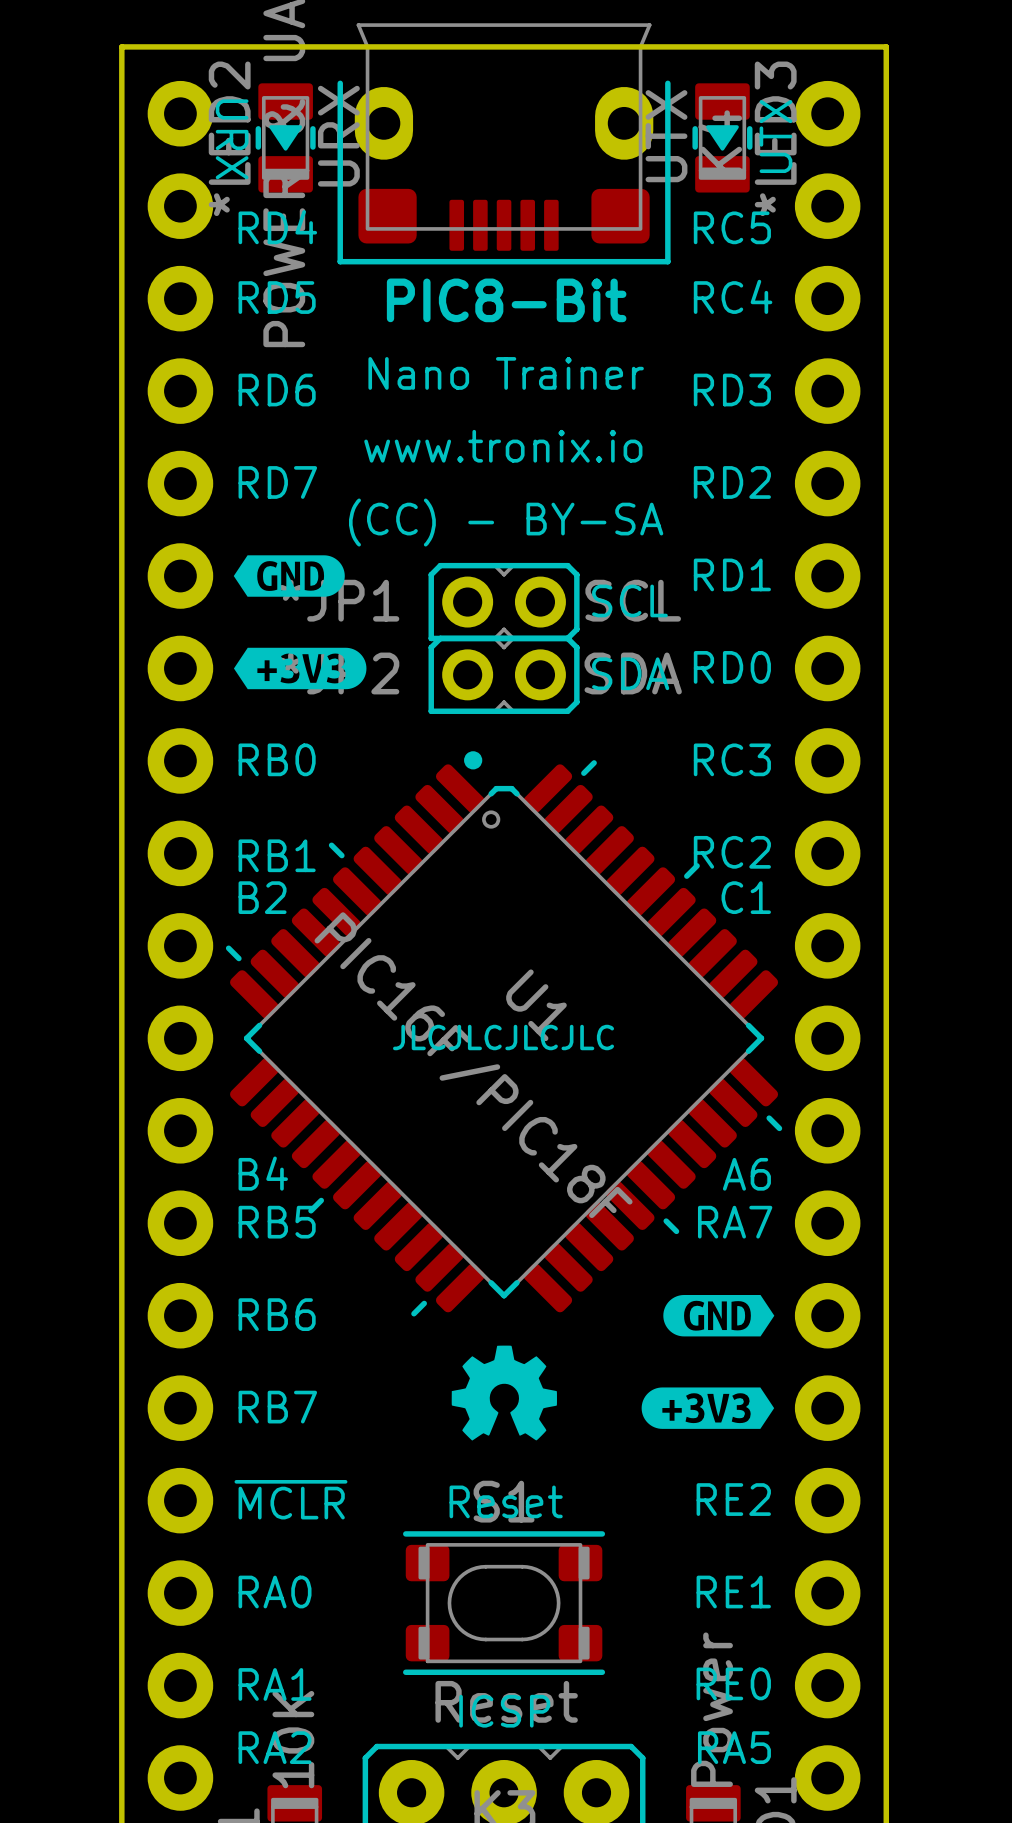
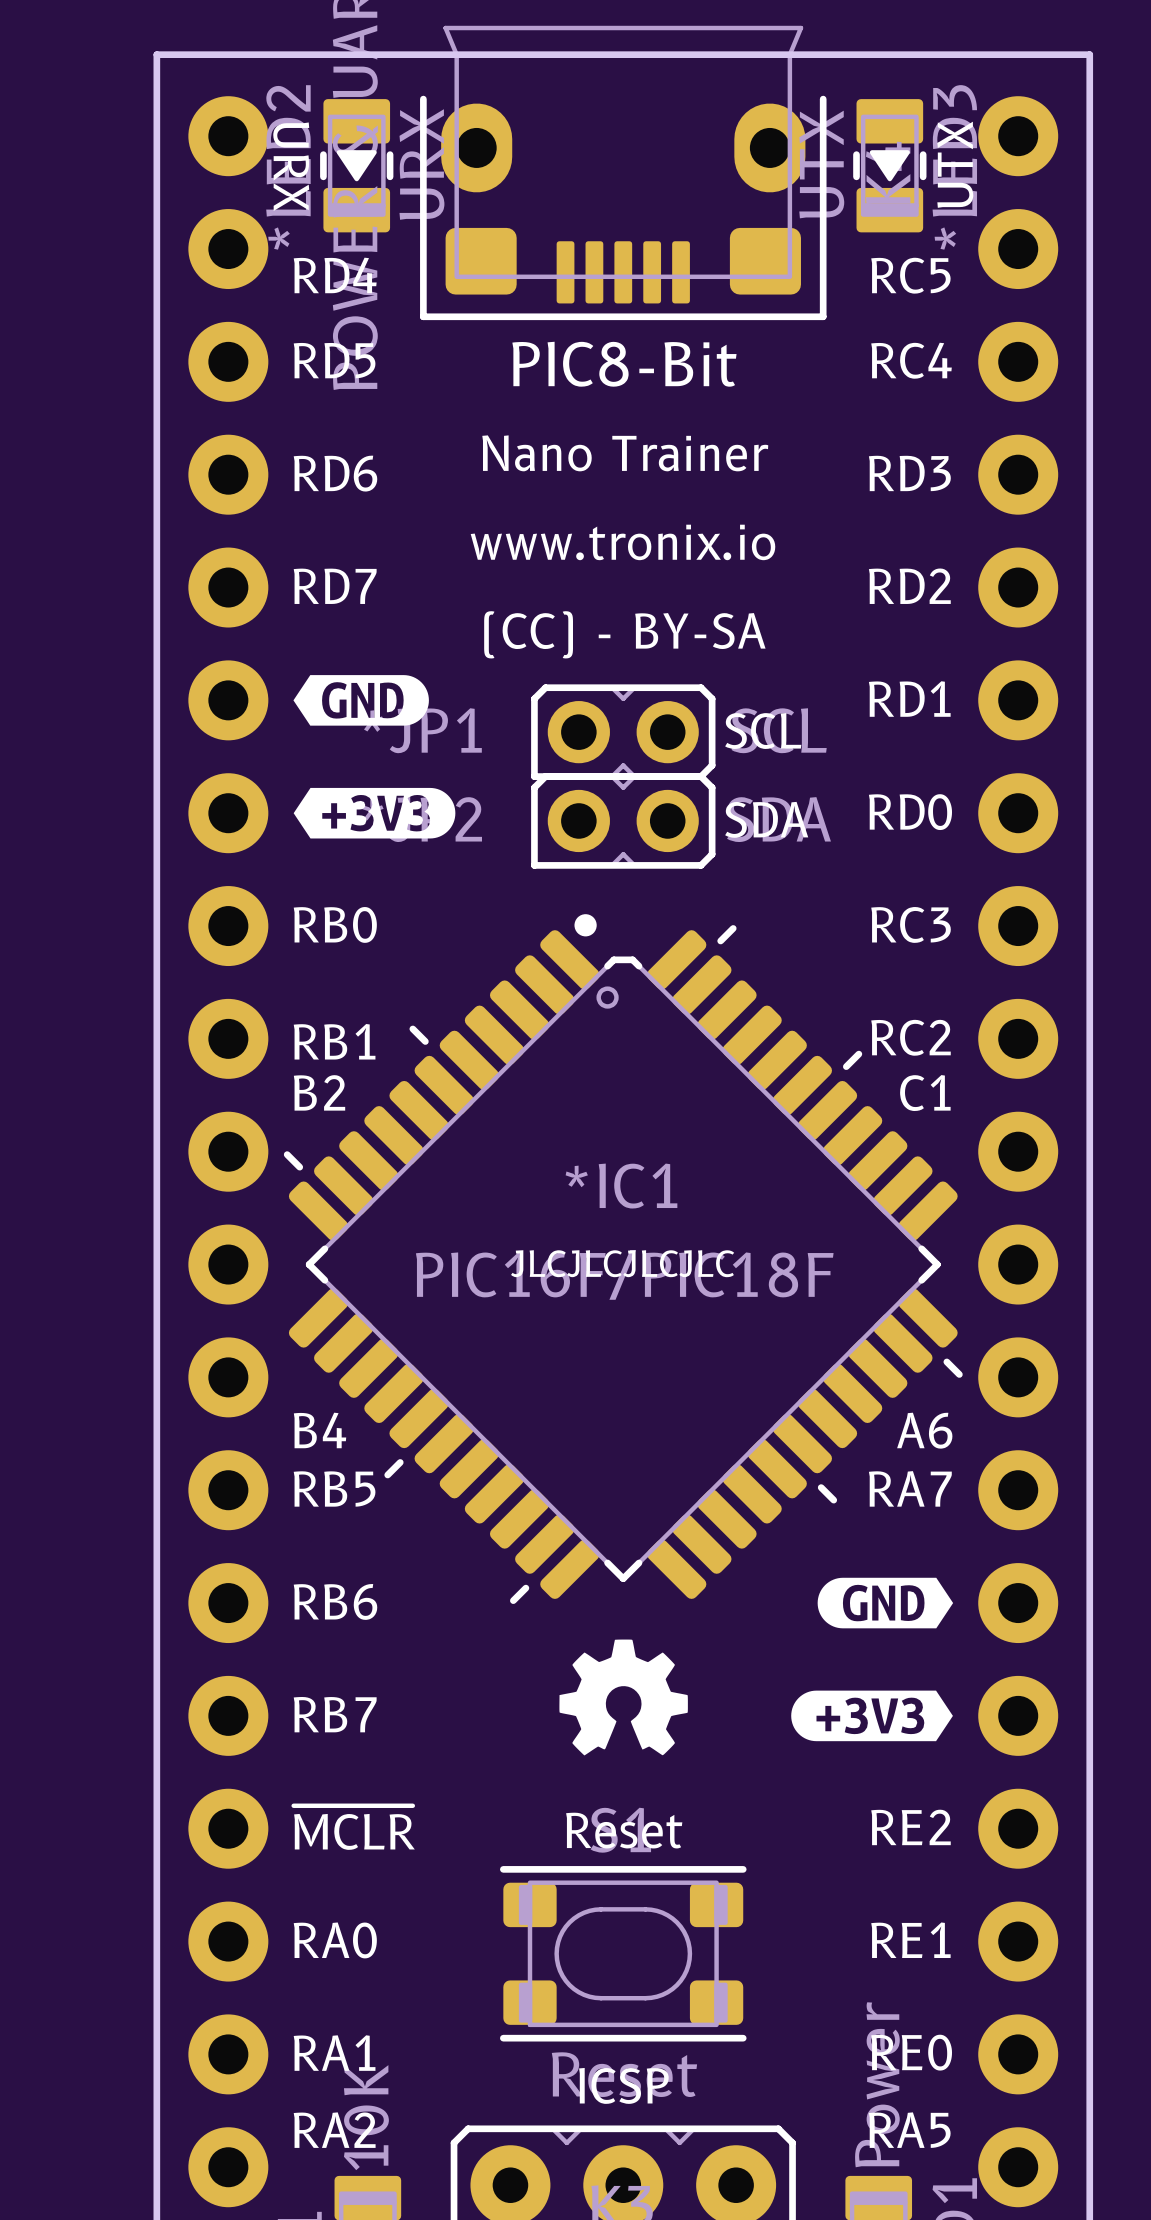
U1 name: U1 (536, 1005) -> *IC1 (621, 1186)
U1 value rotation: 0° (473, 1065) -> 45° counterclockwise (624, 1274)

